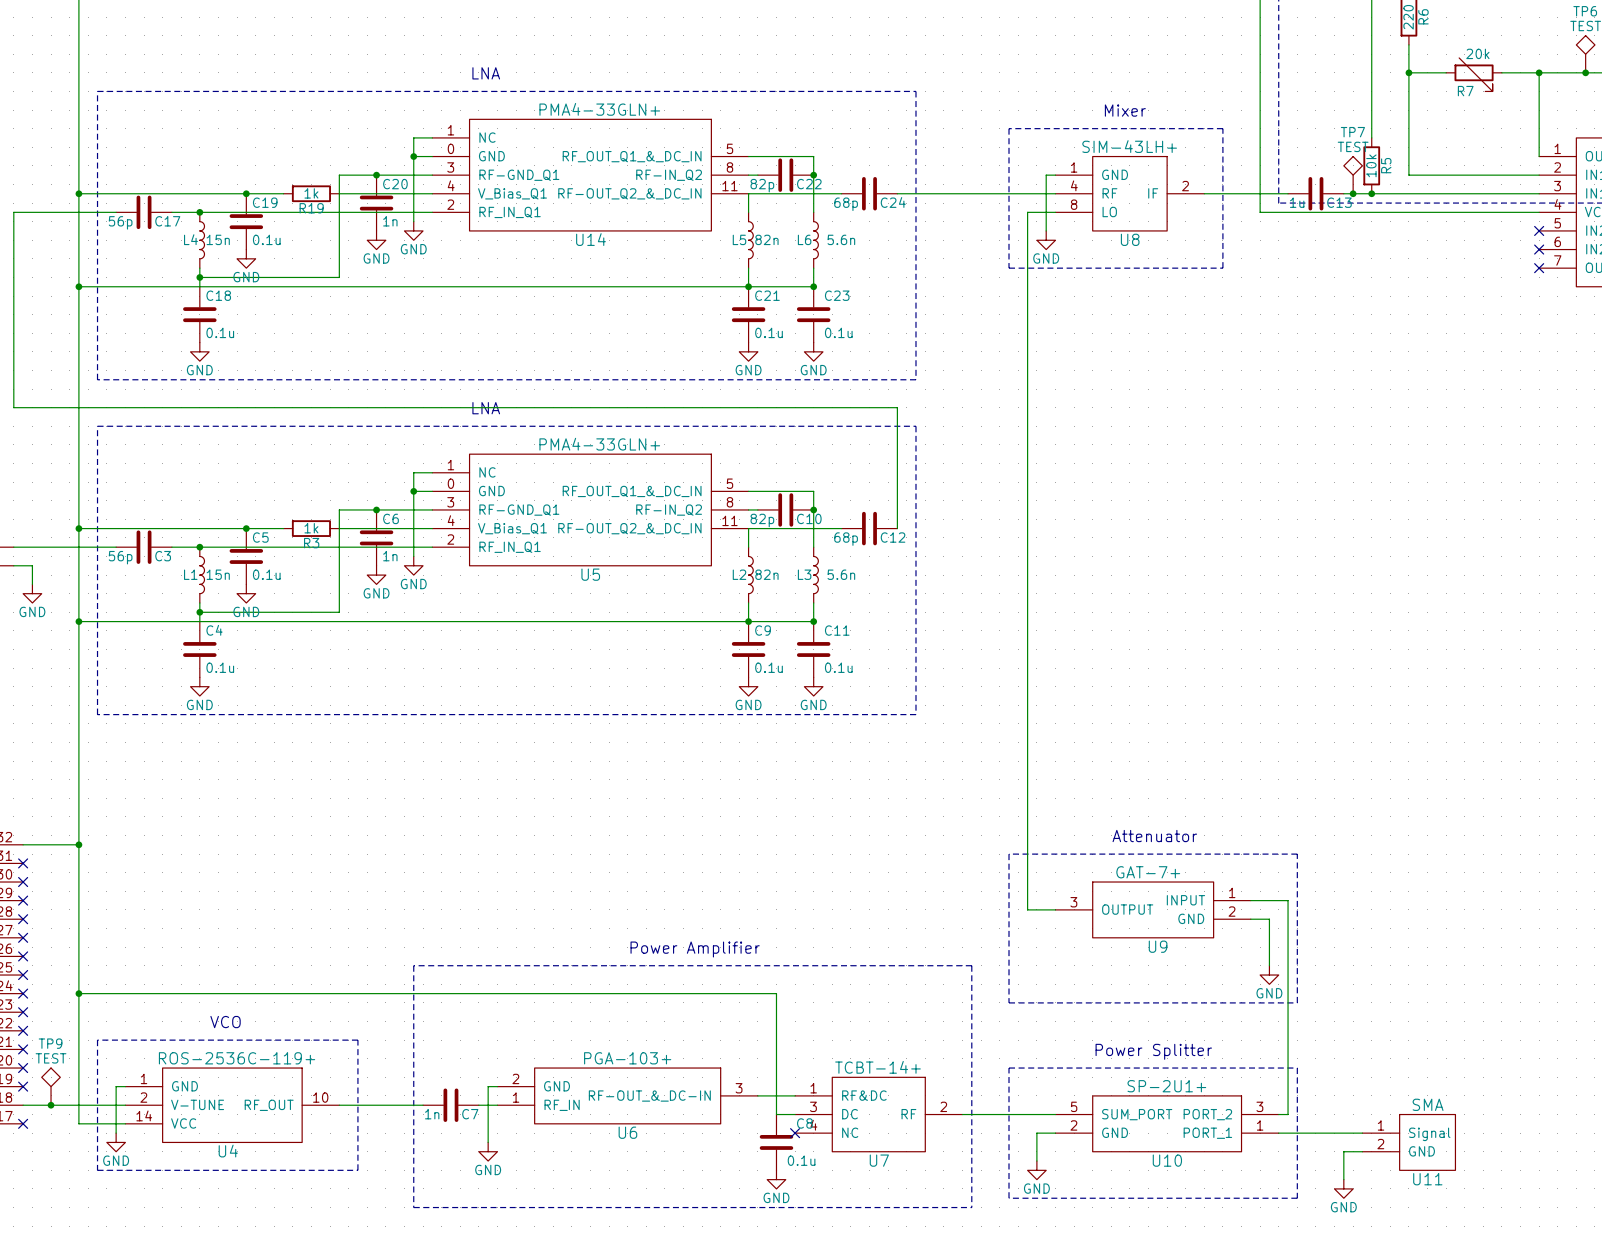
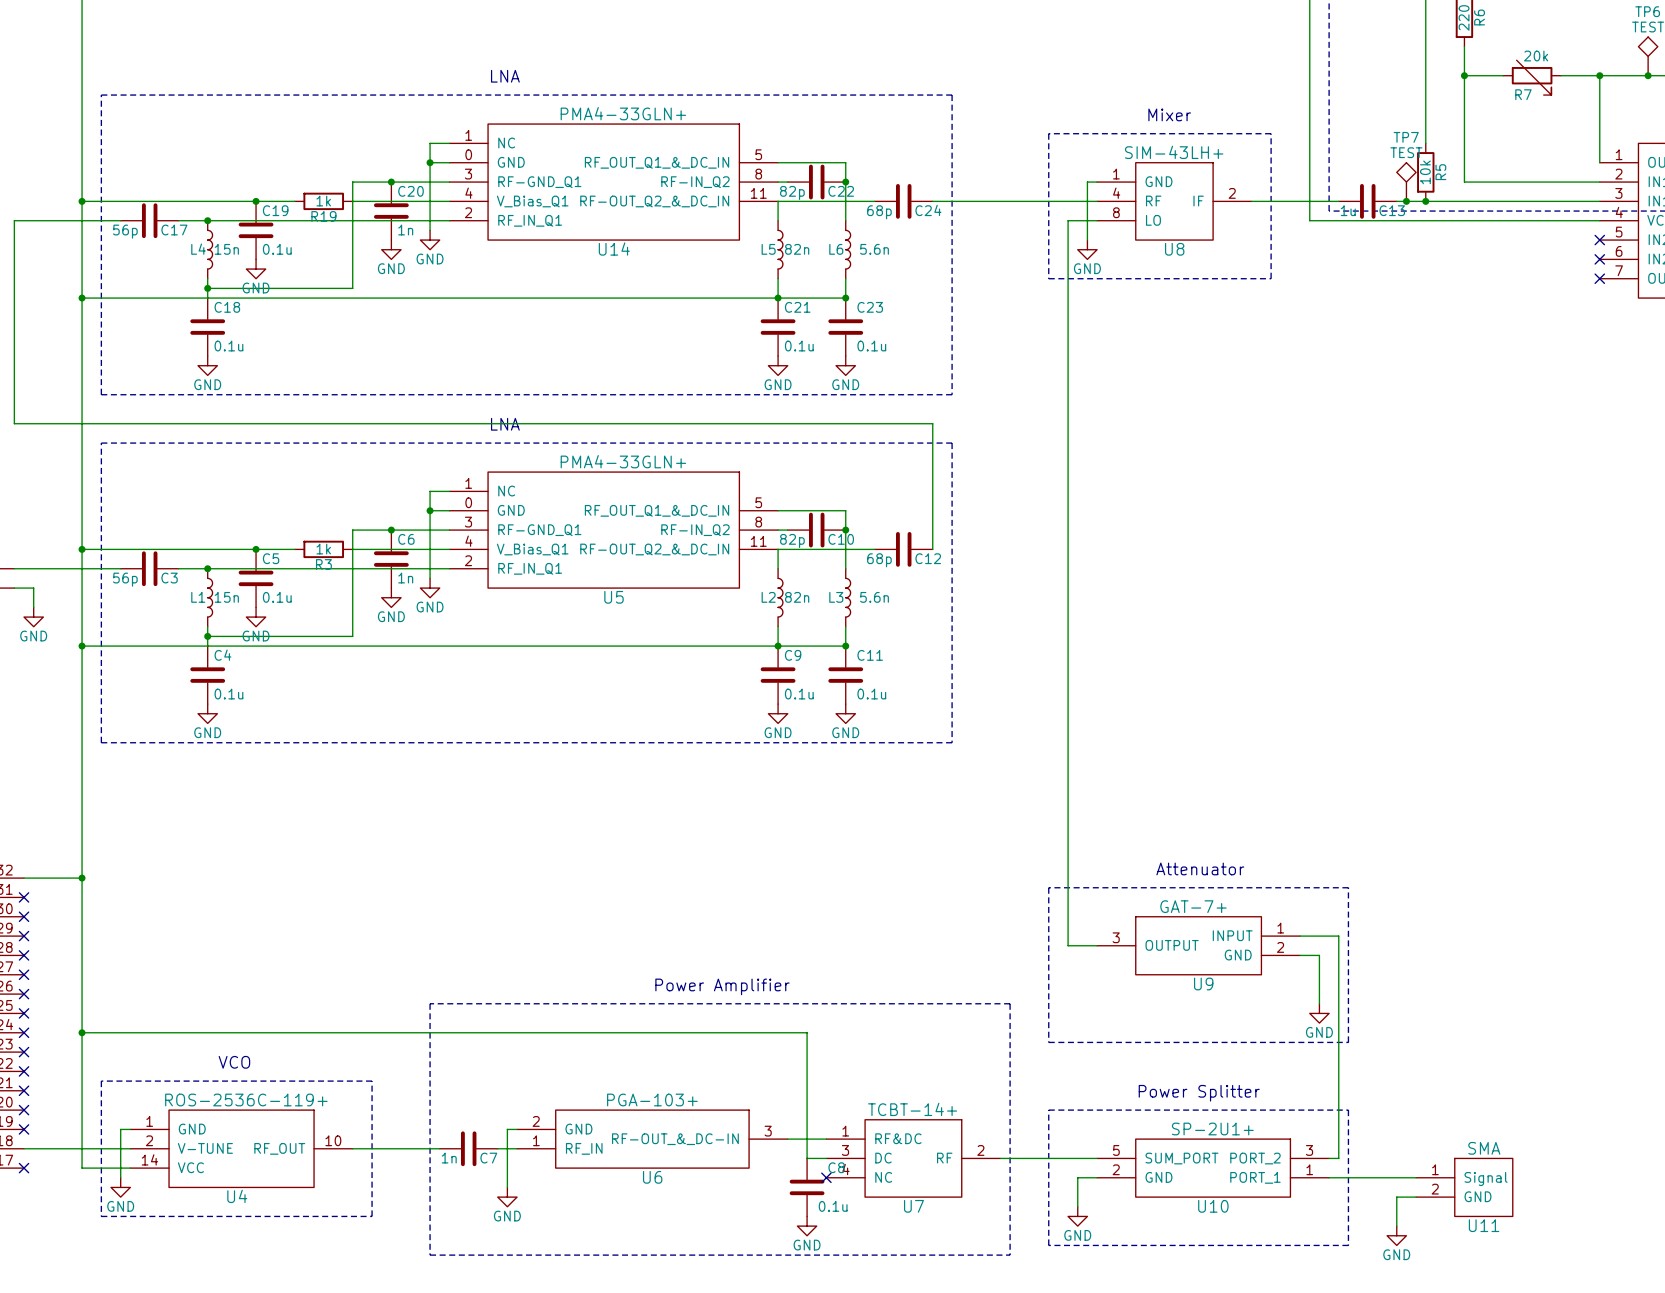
TP9: TEST (51, 1086) -> none
junction: (51, 1105) -> none

